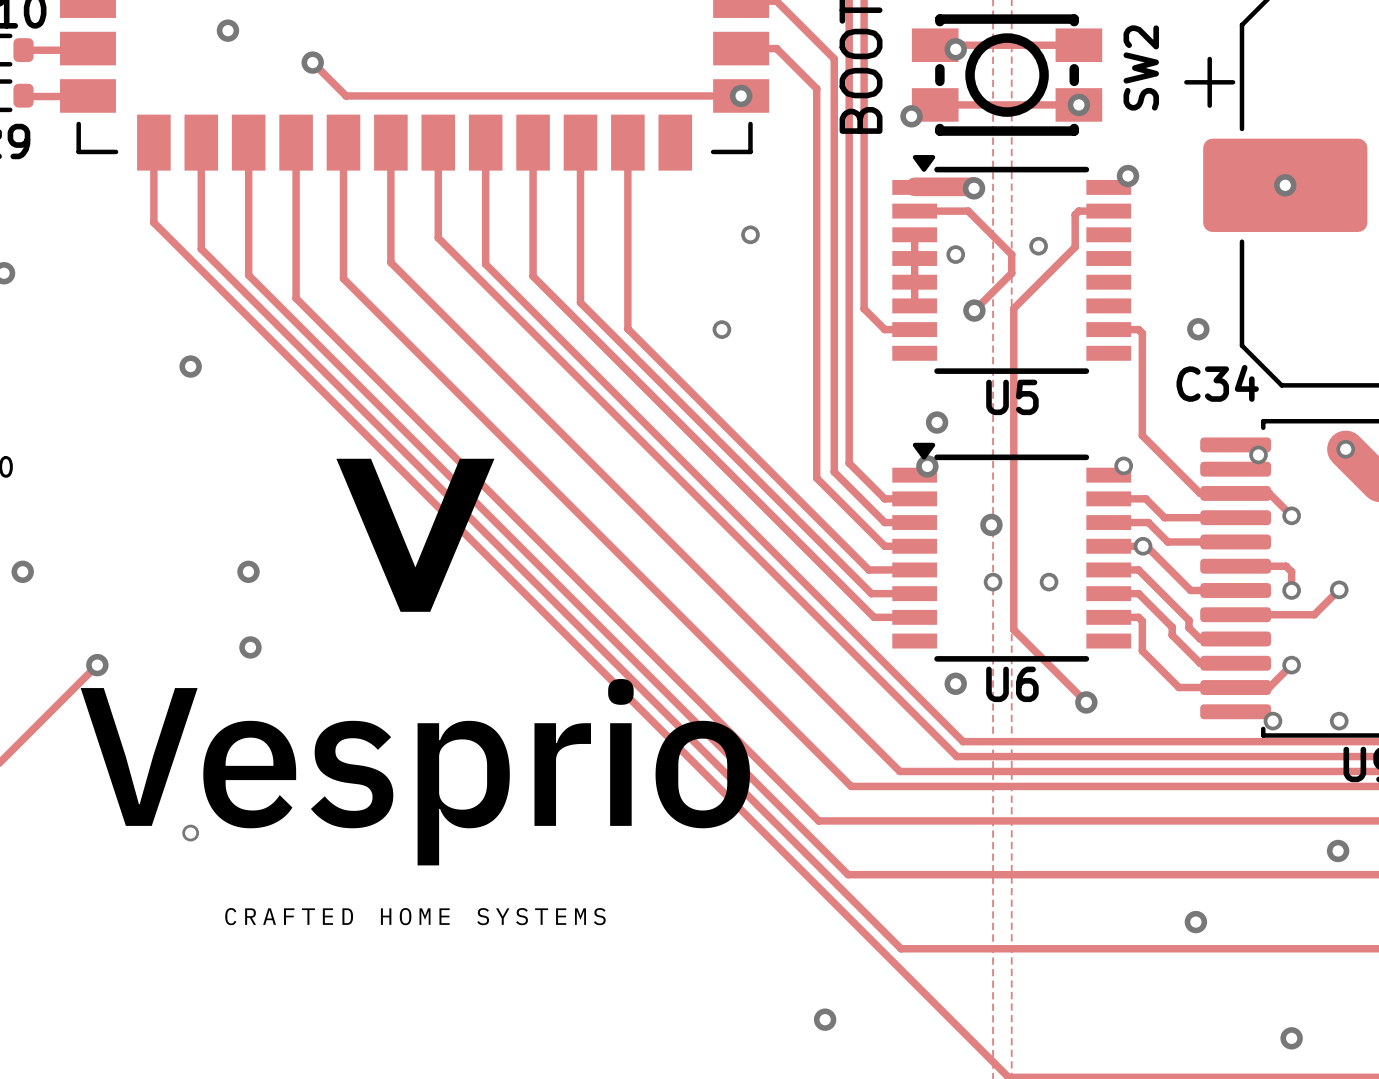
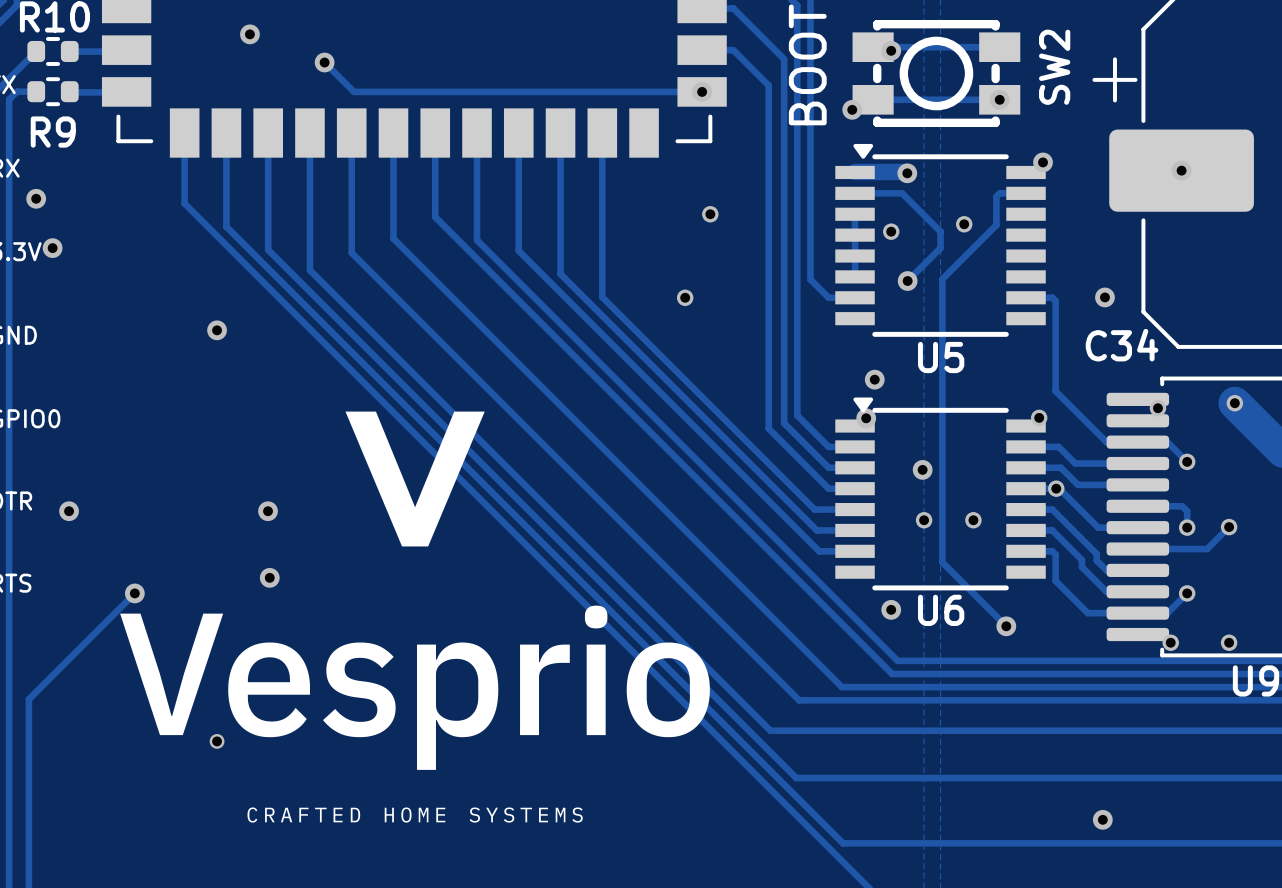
via: (1338, 850) -> none

